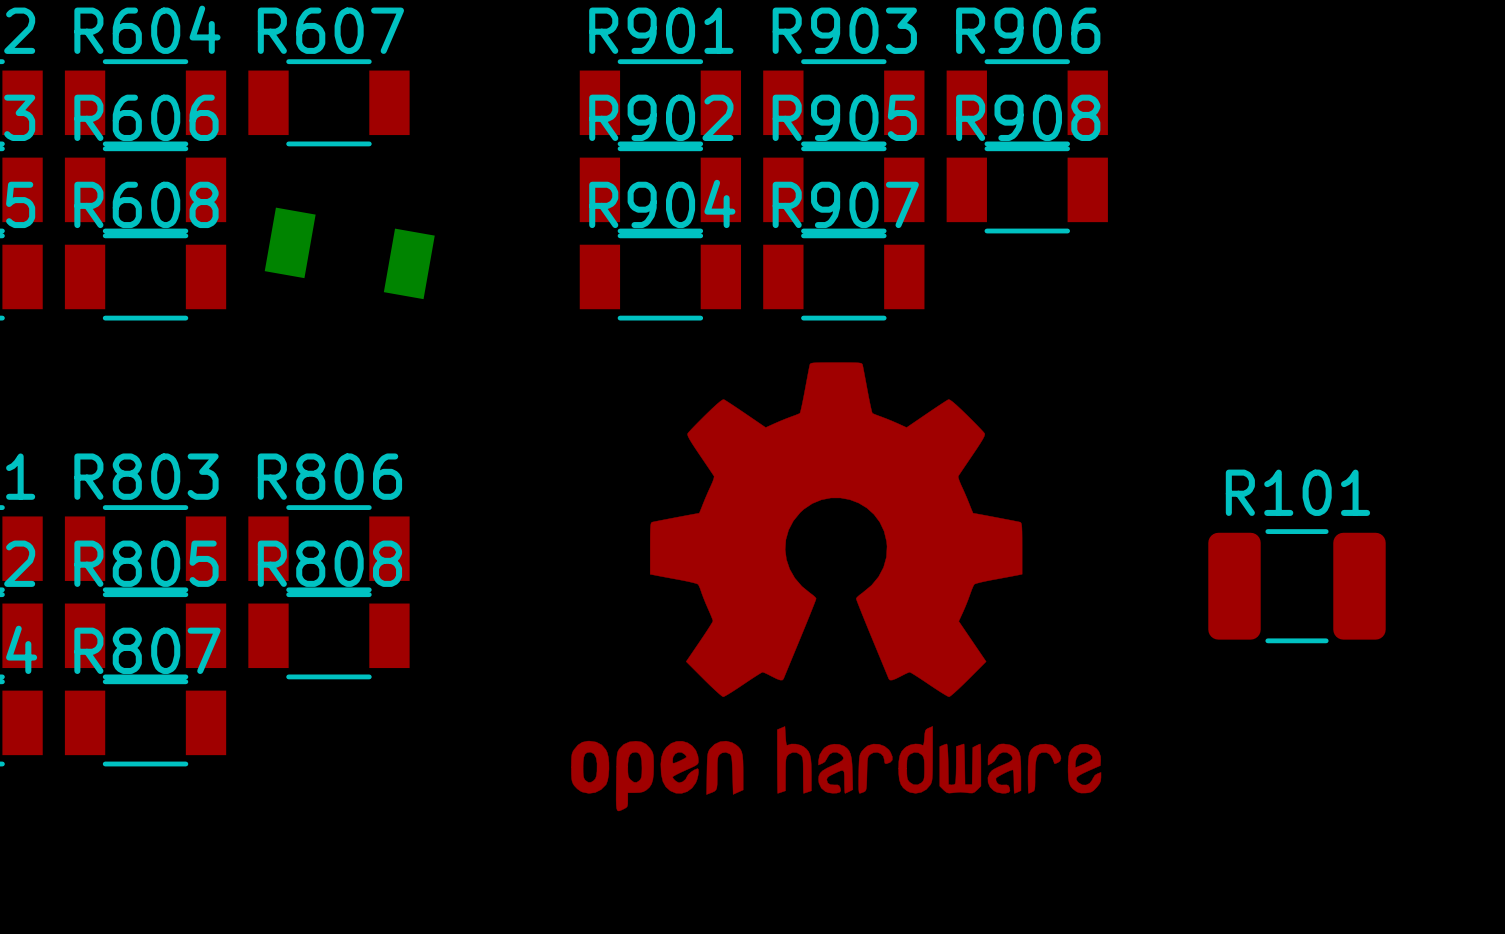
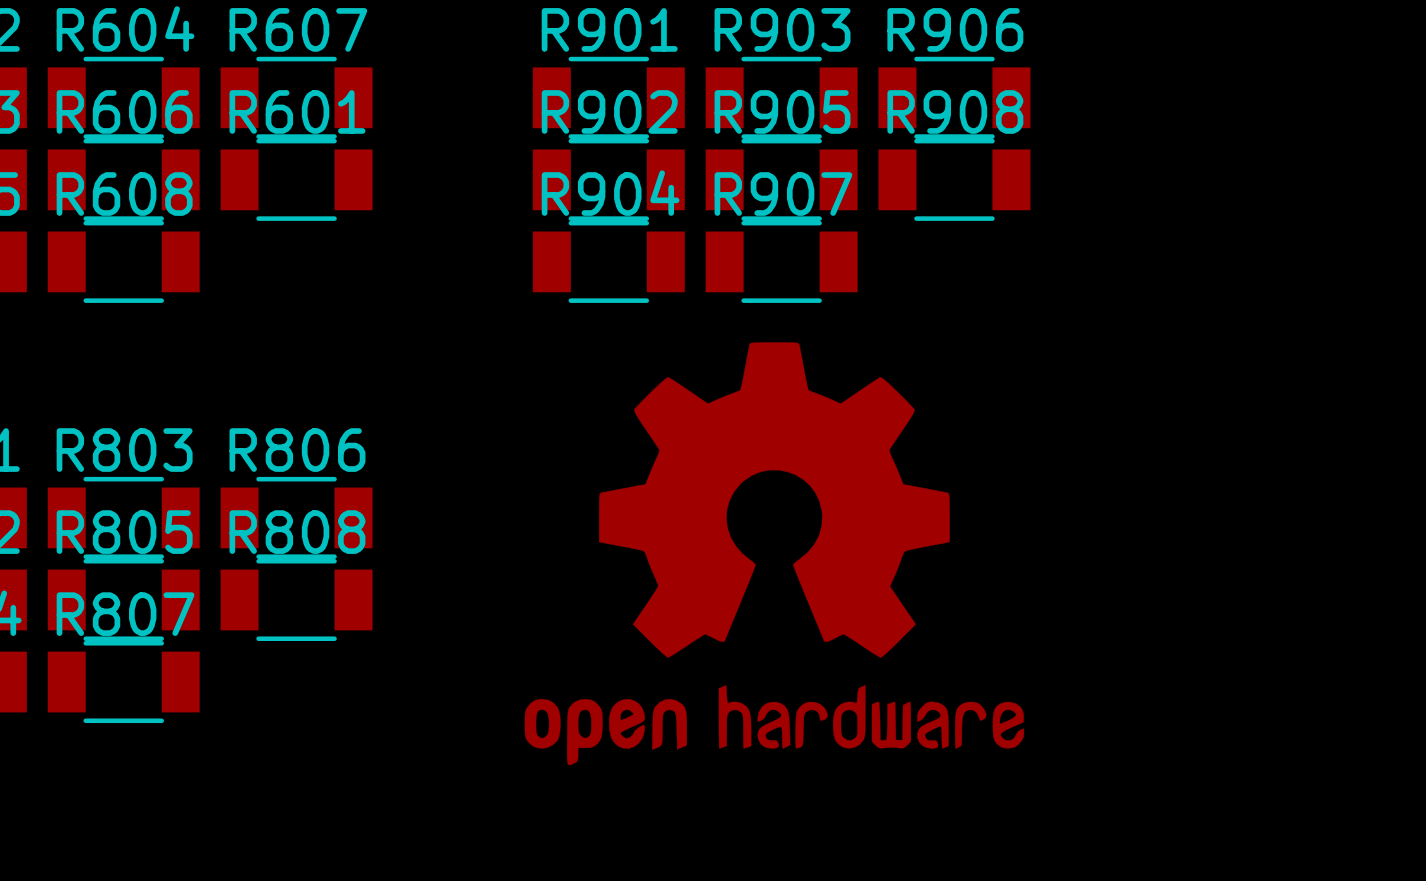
R601 side: bottom (349, 253) -> top (296, 179)
R101: (1296, 586) -> none

